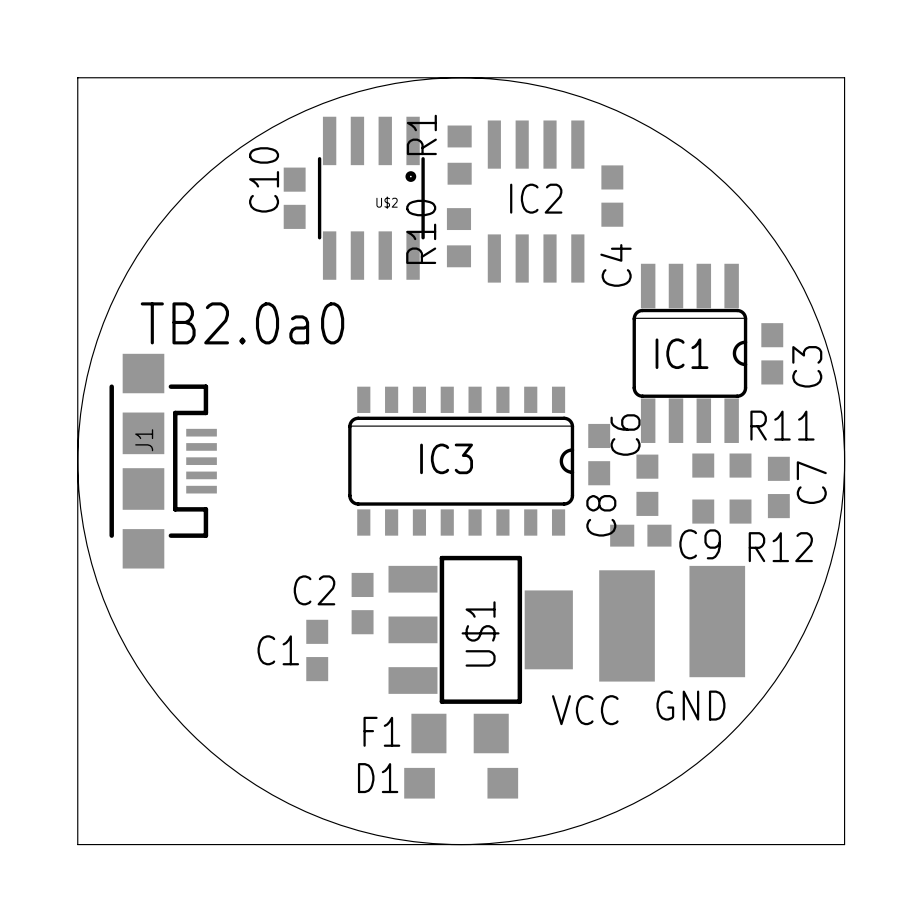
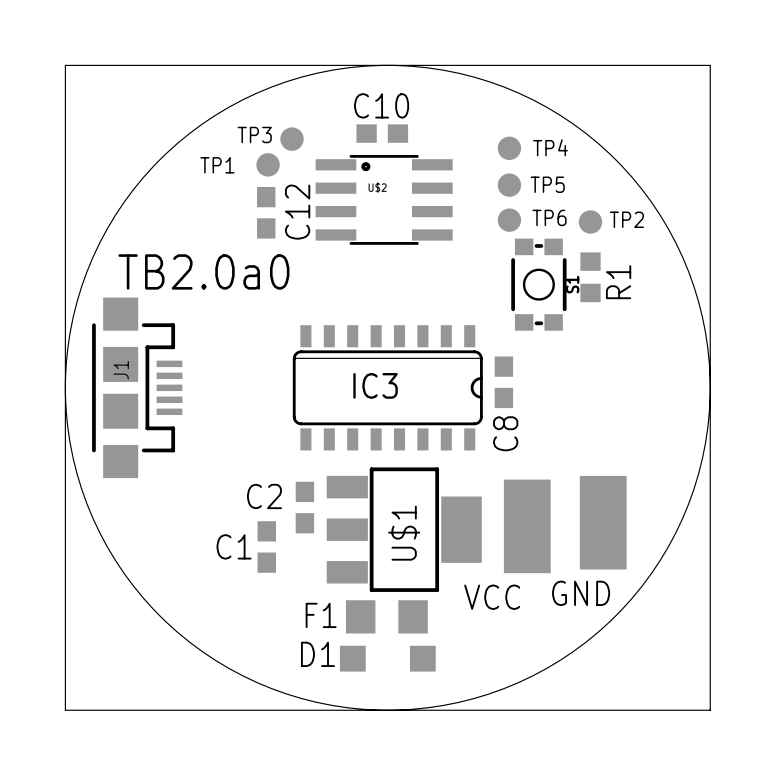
R1 name position: R1 (421, 134) -> R1 (618, 282)
R1 position: (459, 155) -> (590, 277)
TP3: none -> (292, 139)
TP4: none -> (509, 148)
TP1: none -> (268, 164)
C4: (612, 196) -> none
C10 rotation: 0° (294, 198) -> 90° clockwise (382, 133)
C10 position: (294, 198) -> (382, 133)
U$2 rotation: 0° (371, 198) -> 90° counterclockwise (384, 199)
IC2: (536, 201) -> none
TP5: none -> (509, 185)
R10: (458, 237) -> none
C12: none -> (266, 212)
TP6: none -> (509, 220)
TP2: none -> (590, 222)
S1: none -> (538, 284)
IC1: (689, 353) -> none
C3: (772, 353) -> none
R11: (721, 465) -> none
C6: (647, 485) -> none
C7: (778, 487) -> none
R12: (721, 511) -> none
C9: (640, 535) -> none

